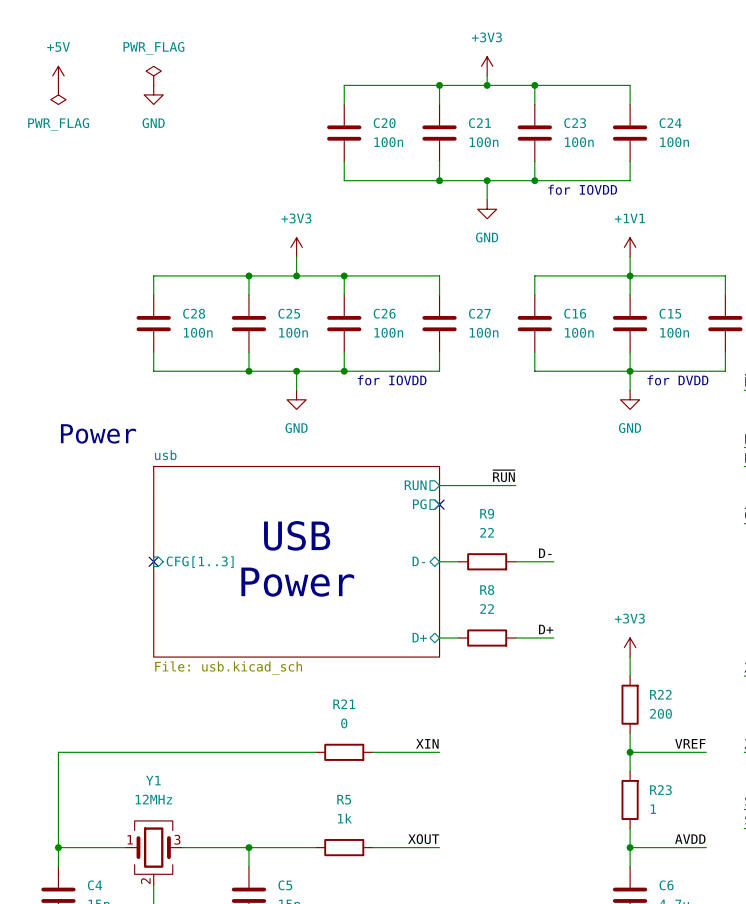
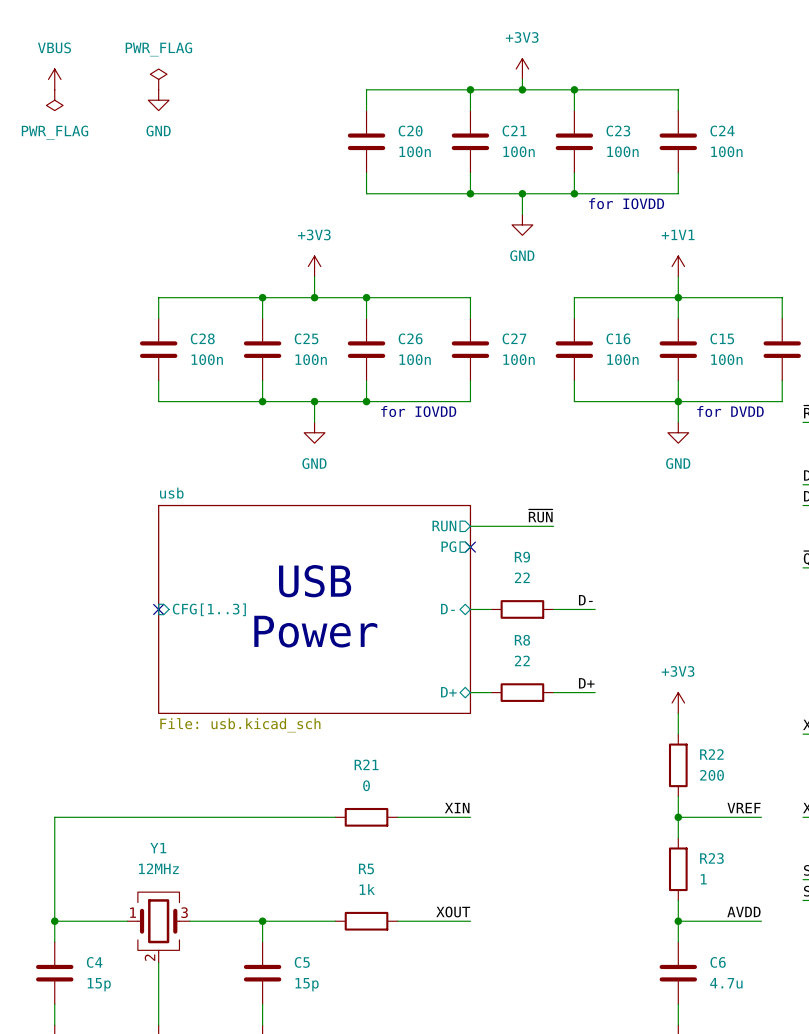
power symbol: +5V (58, 75) -> VBUS (54, 79)
text: Power (98, 433) -> none

